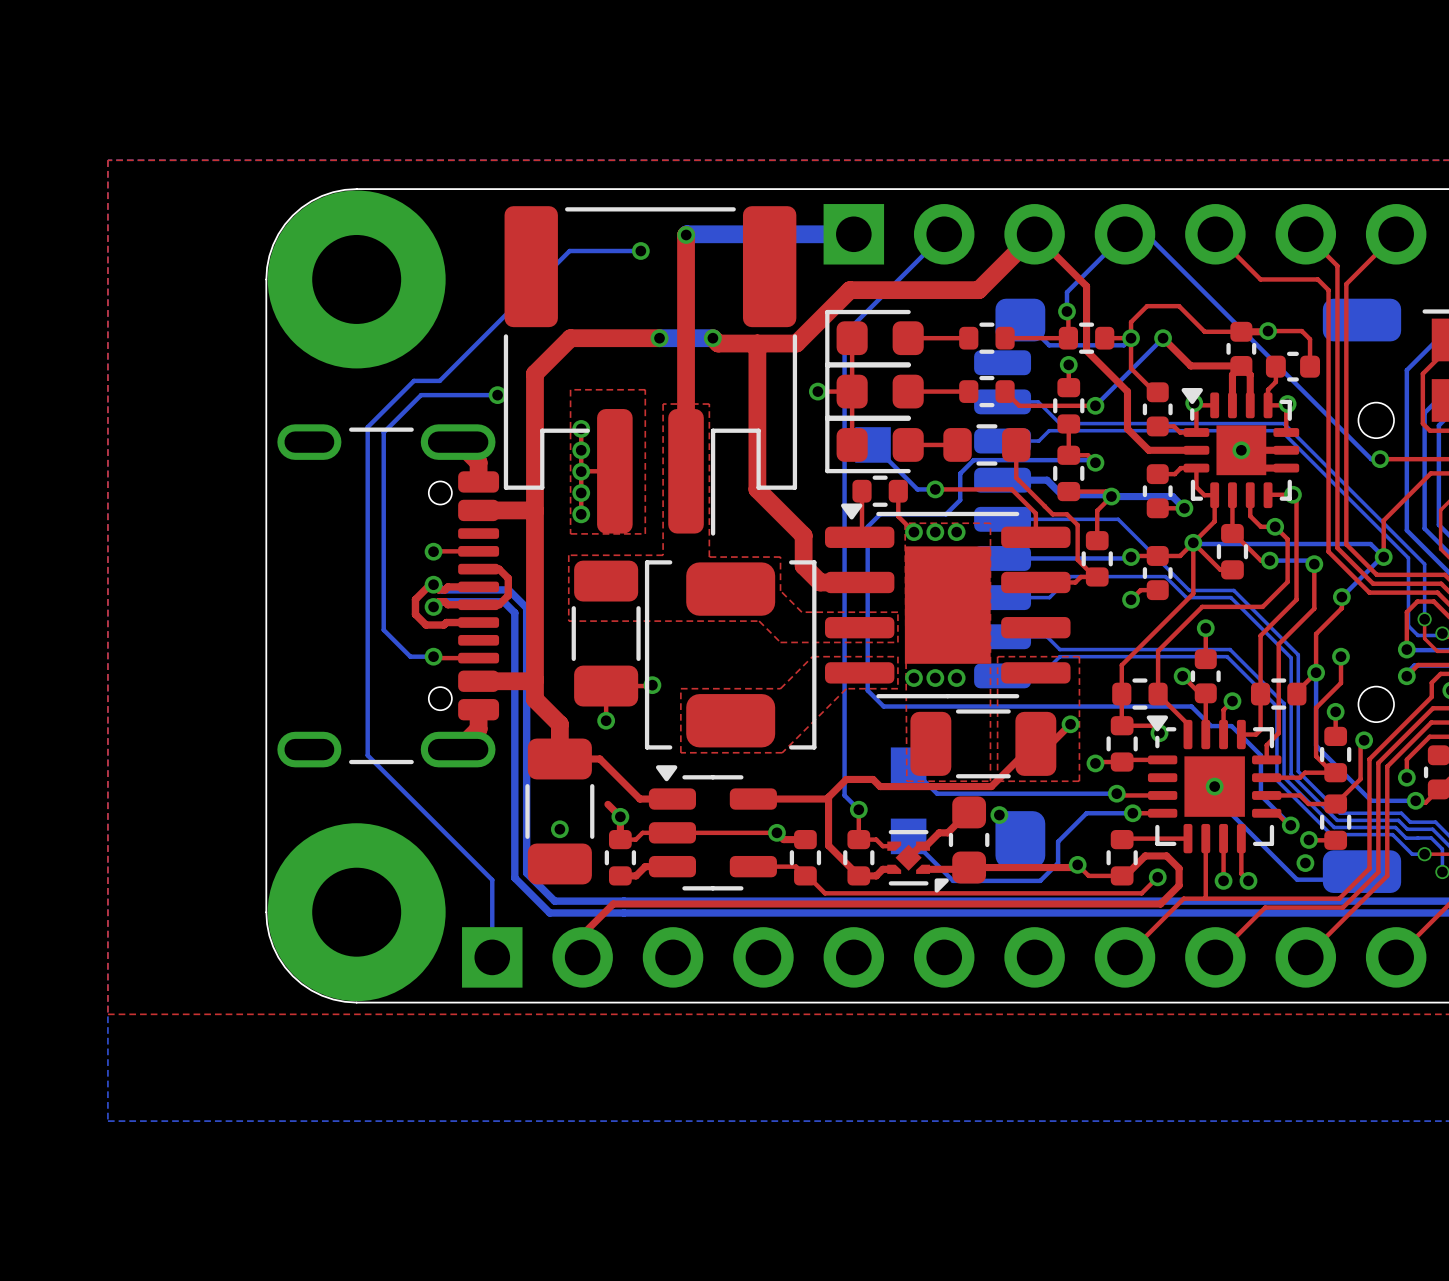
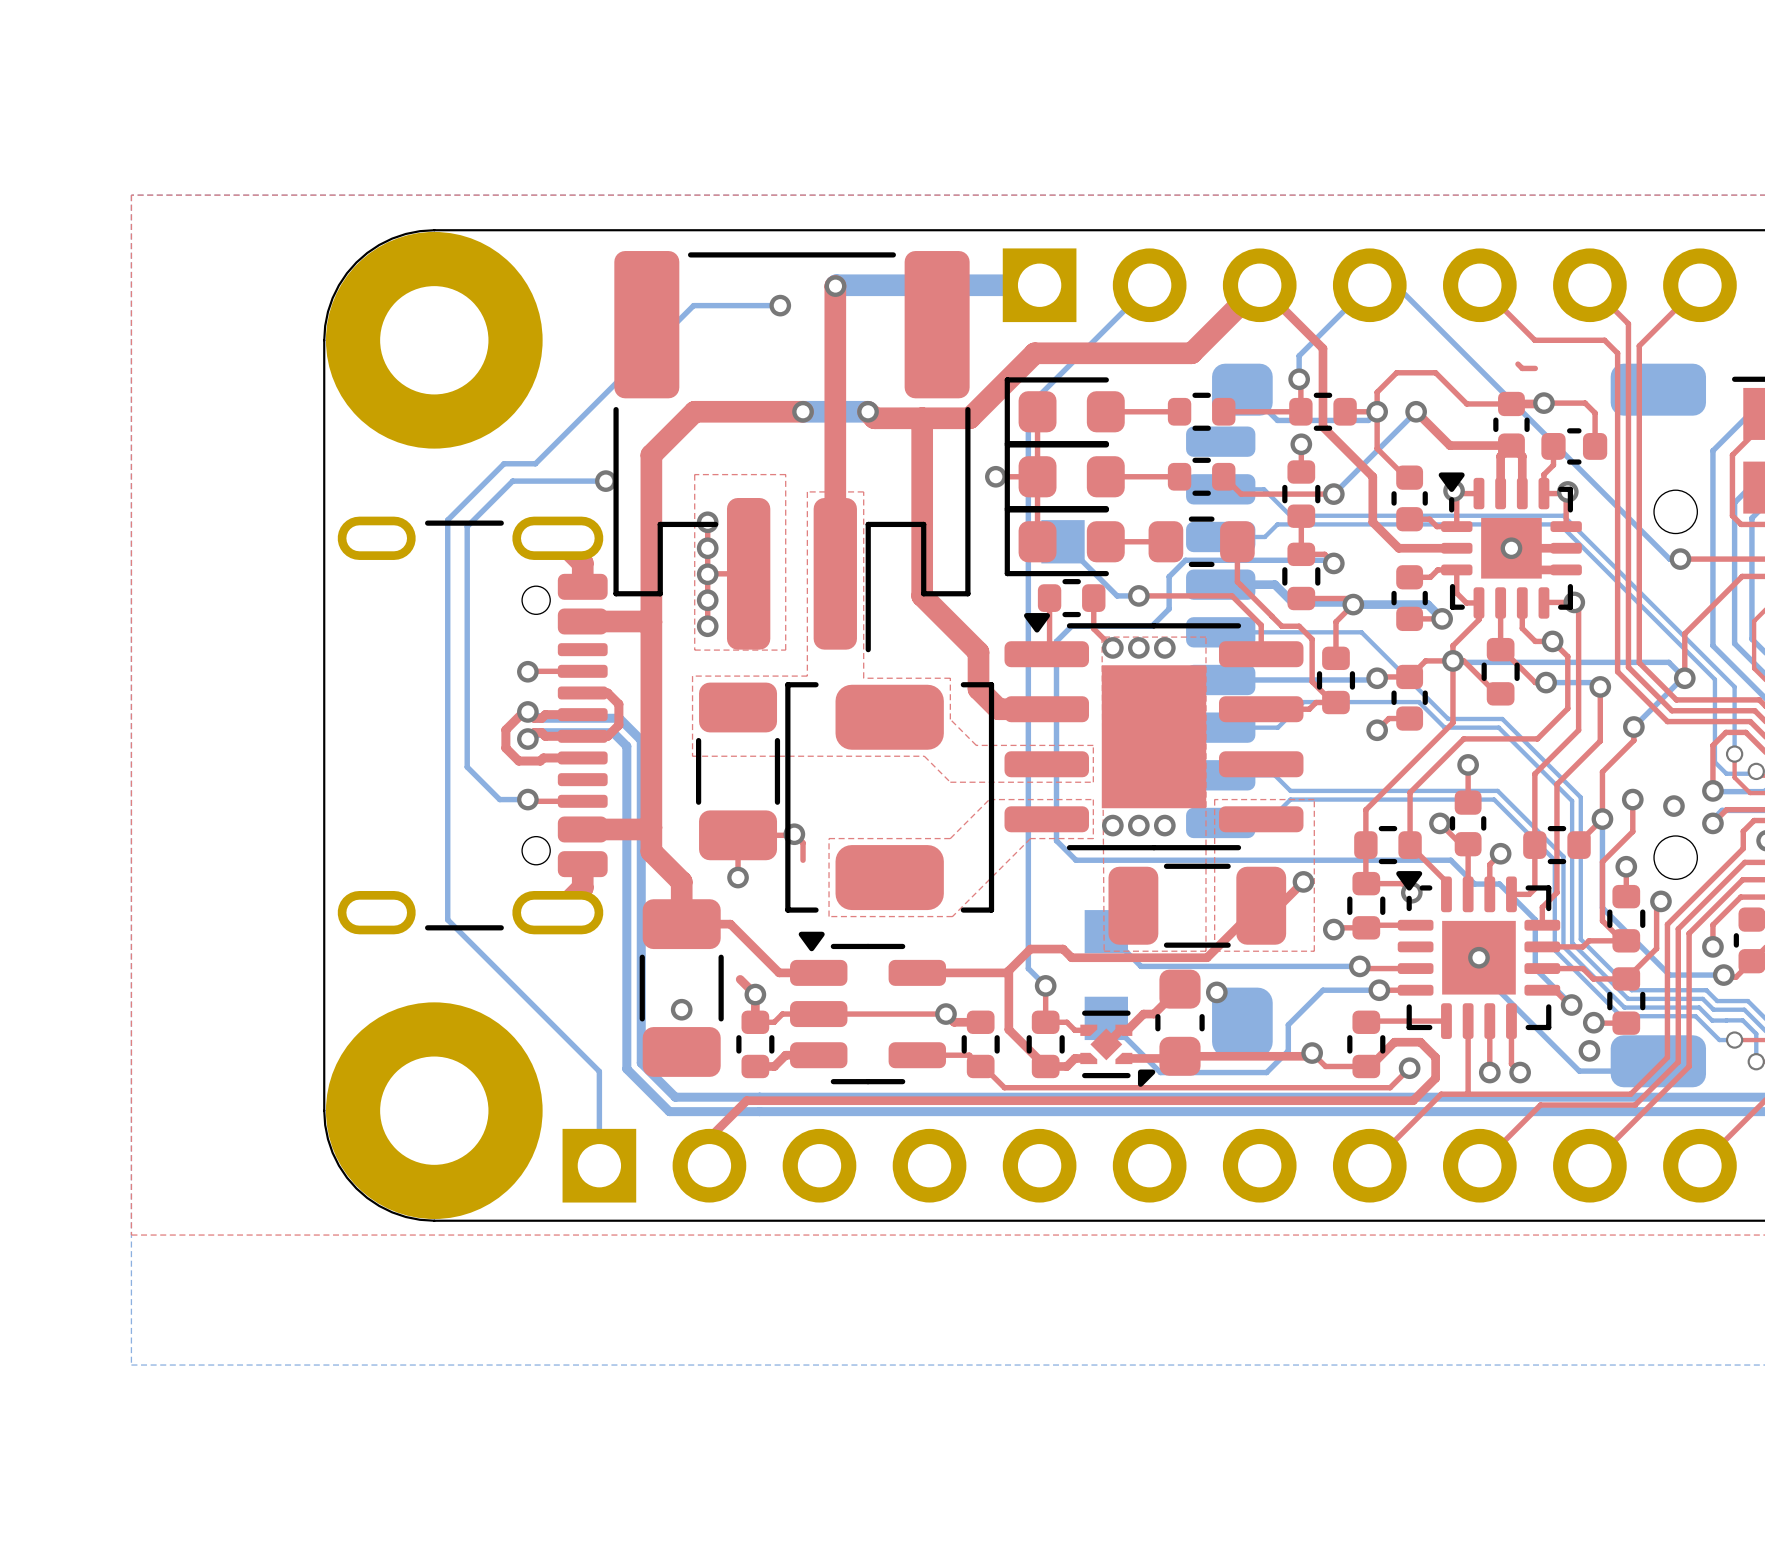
top track: none -> (1517, 364) (1522, 368) (1535, 368)
top track: (1214, 509) (1214, 521) (1180, 555) (1157, 555) -> (1478, 619) (1452, 645) (1452, 660)
top track: (1193, 542) (1220, 569) (1229, 569) -> (1409, 676) (1425, 660) (1463, 660) (1496, 693)
via: none -> (1673, 806)
top track: none -> (794, 834) (803, 842) (803, 860)

